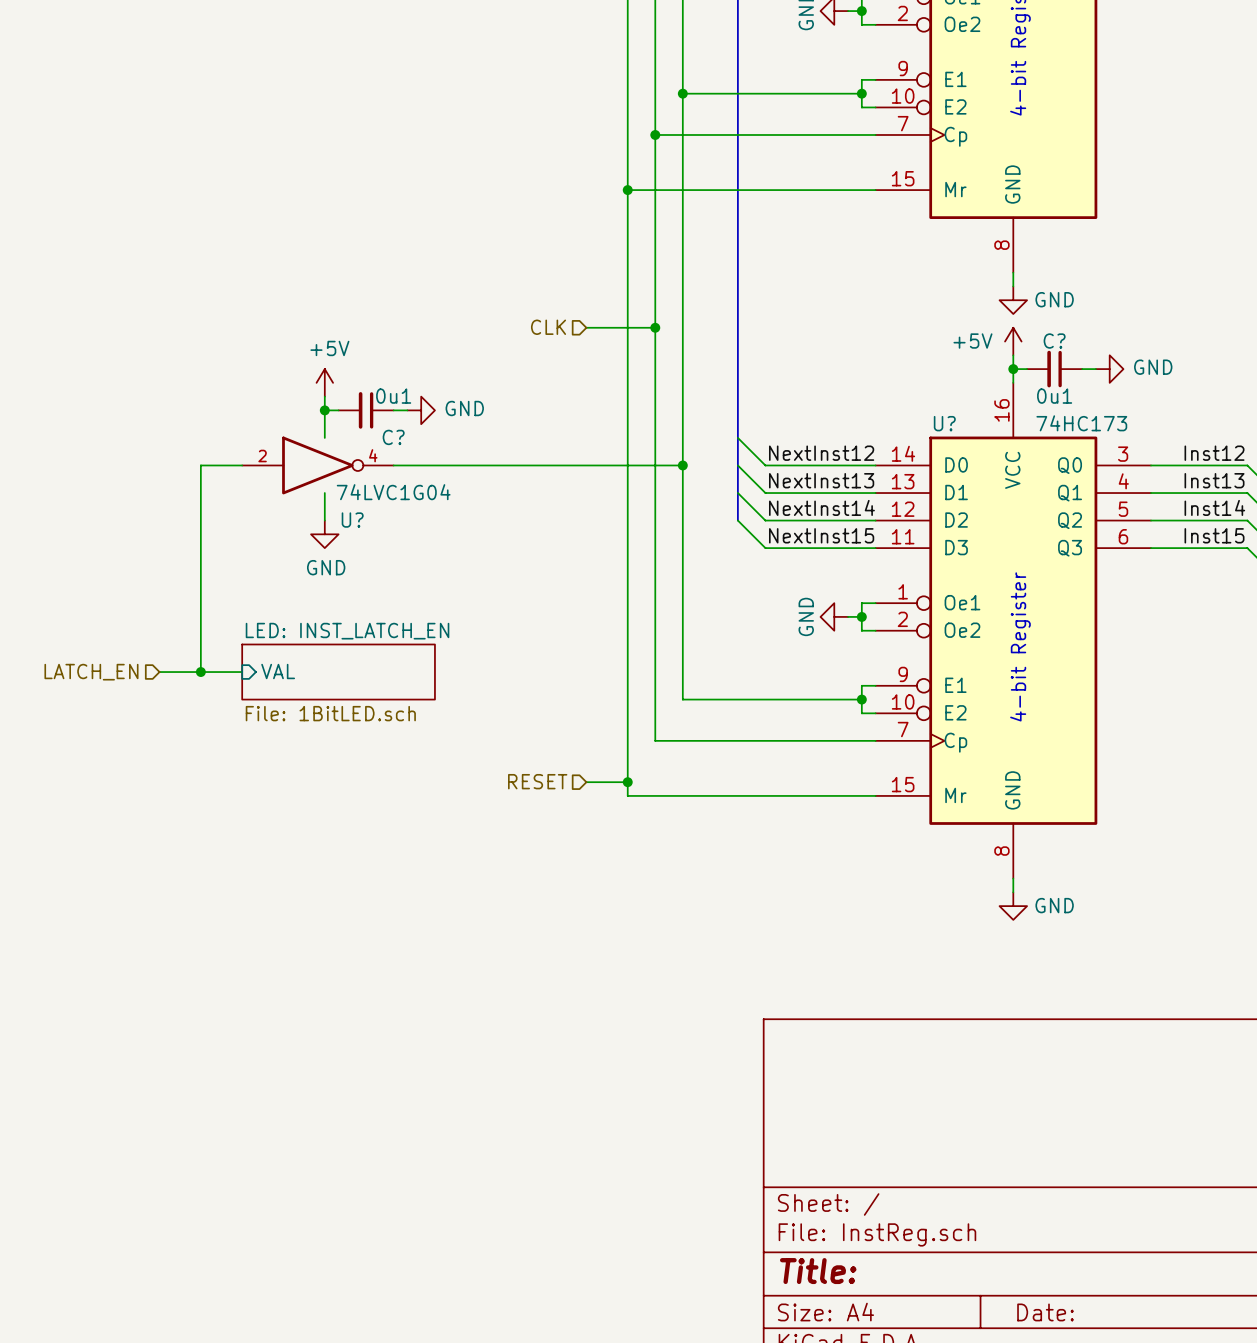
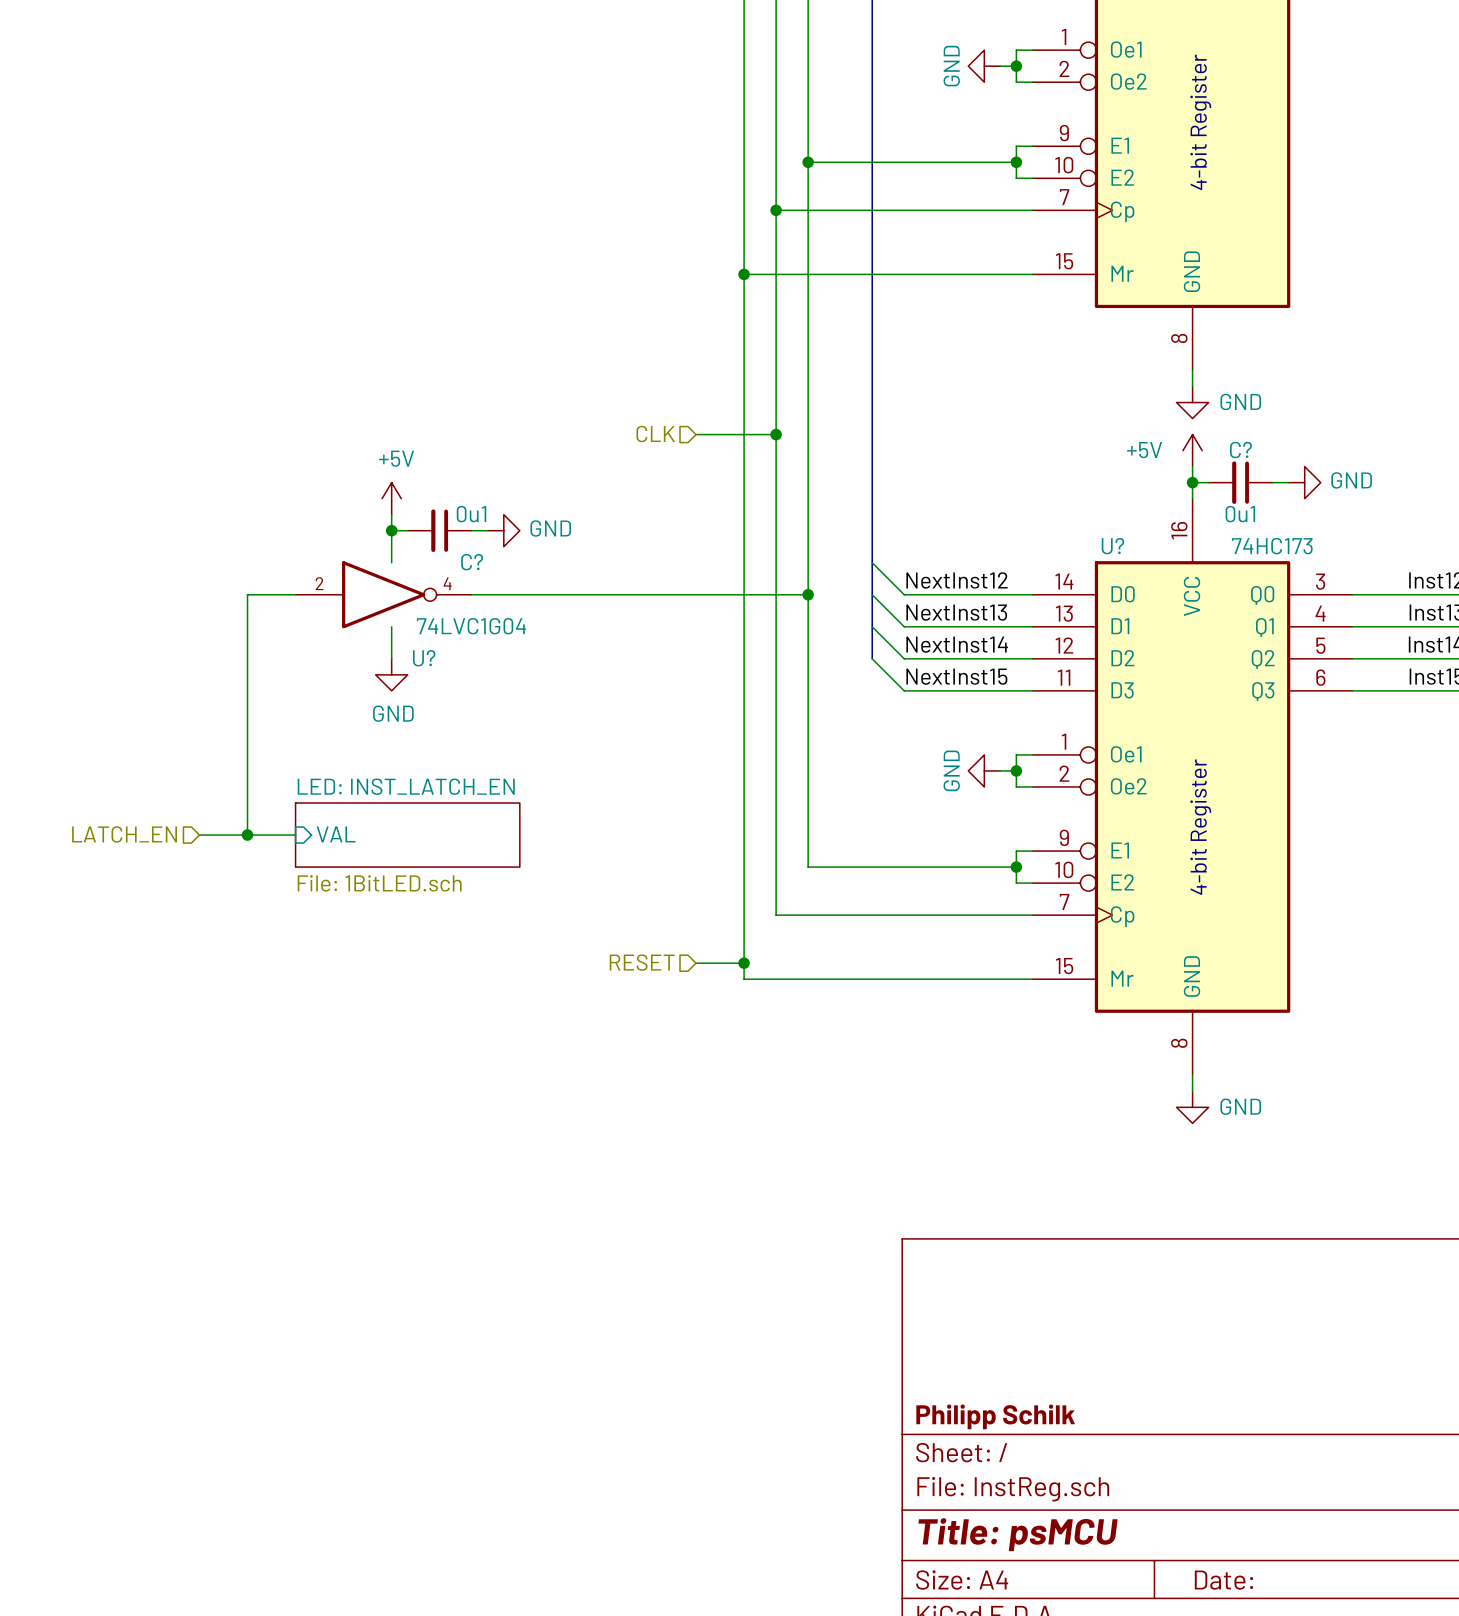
title block: none -> Philipp Schilk (995, 1416)
title block: Title: (818, 1271) -> Title: psMCU (1018, 1534)

